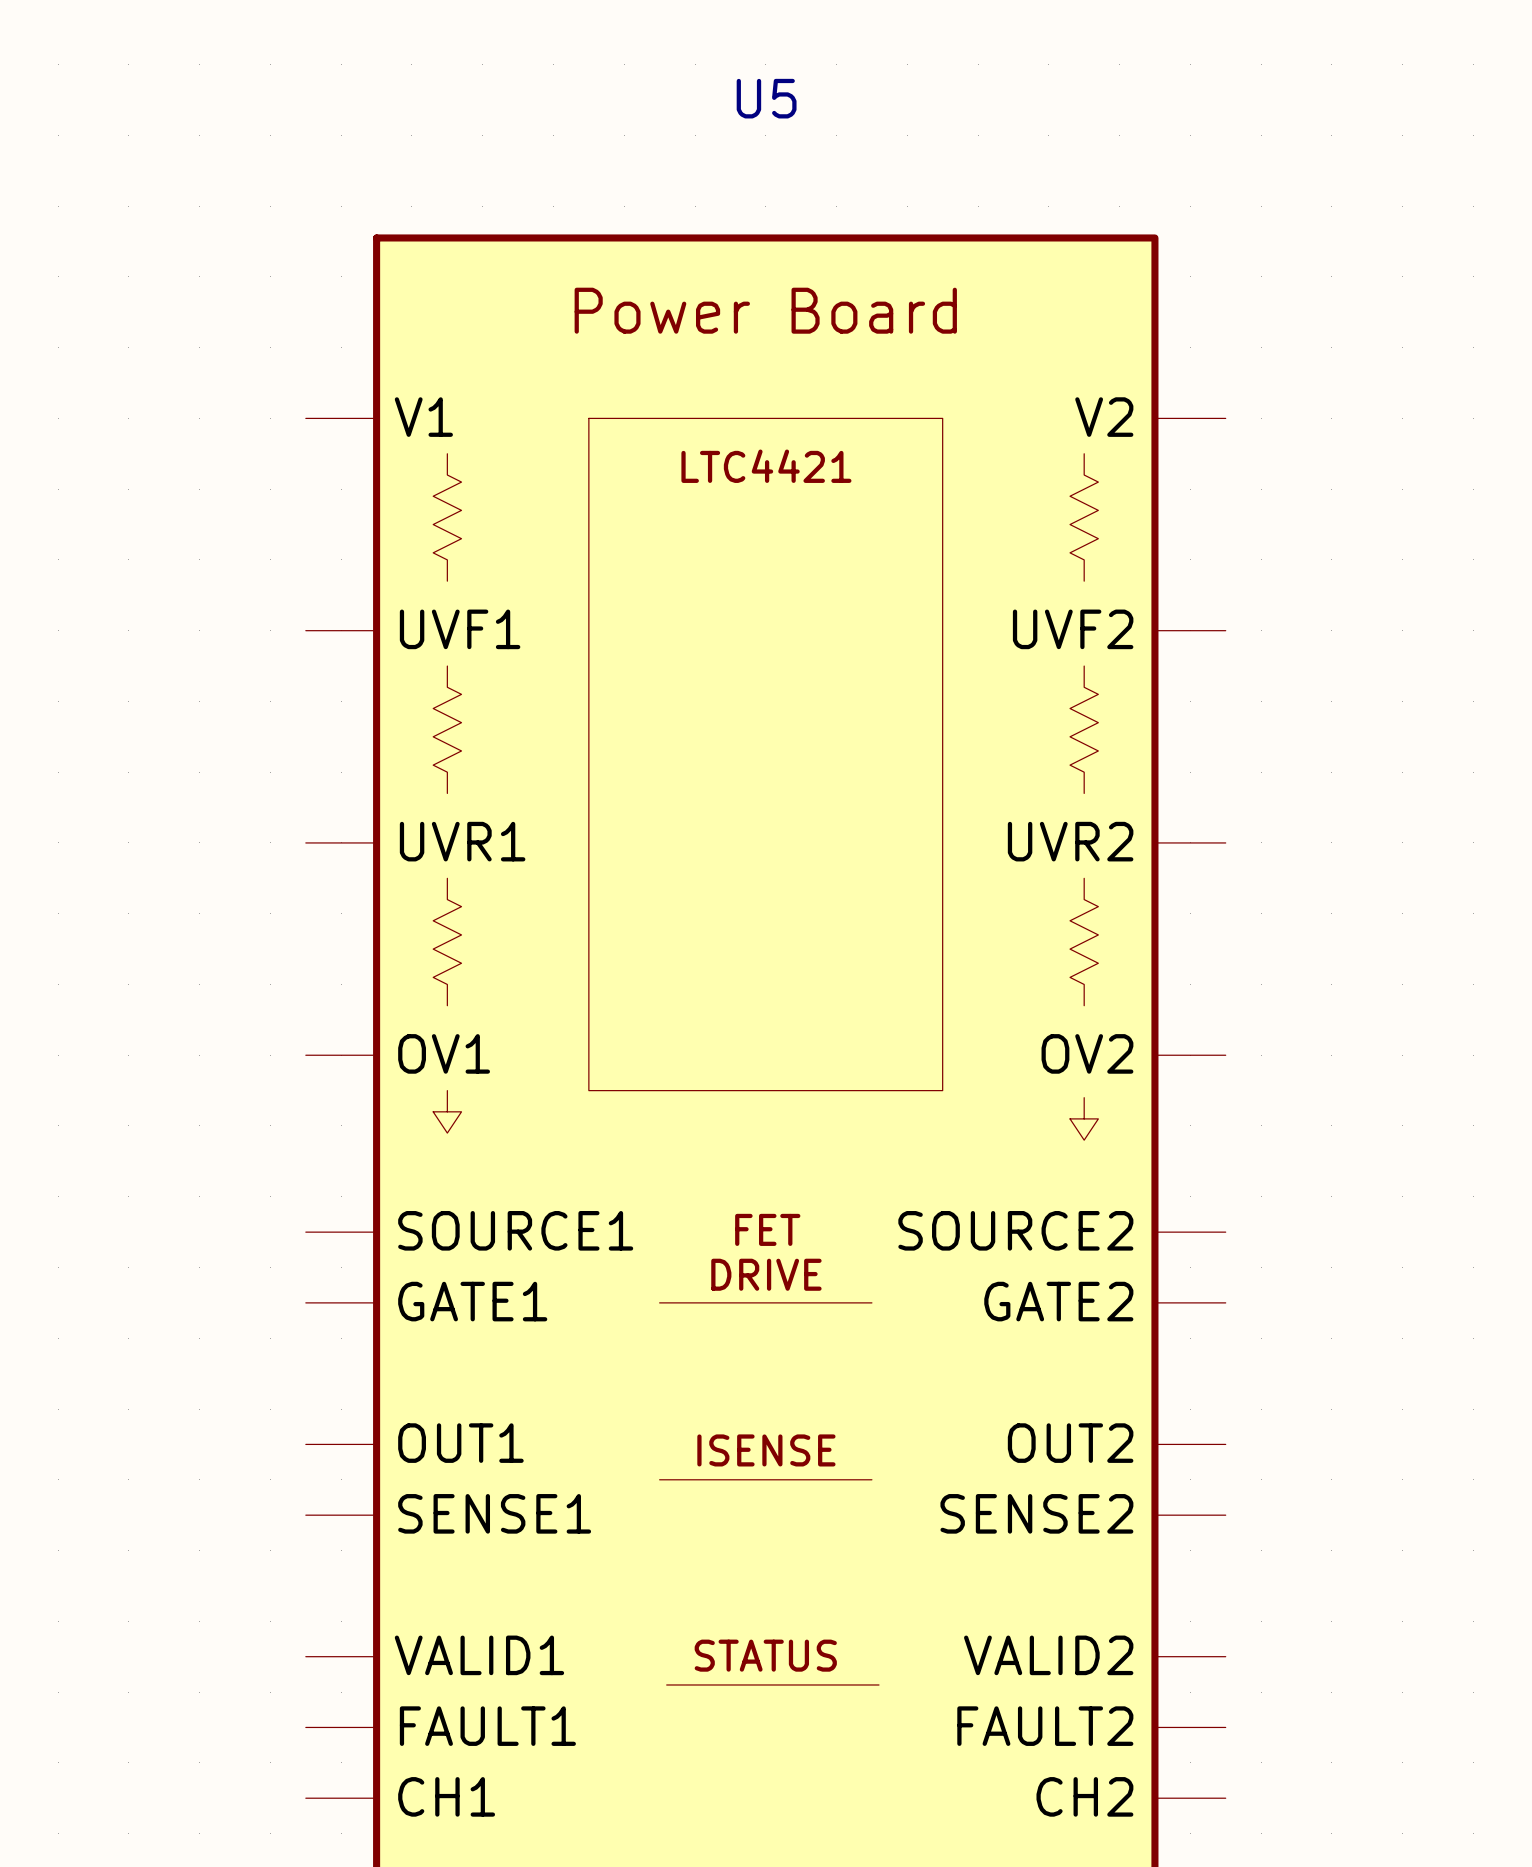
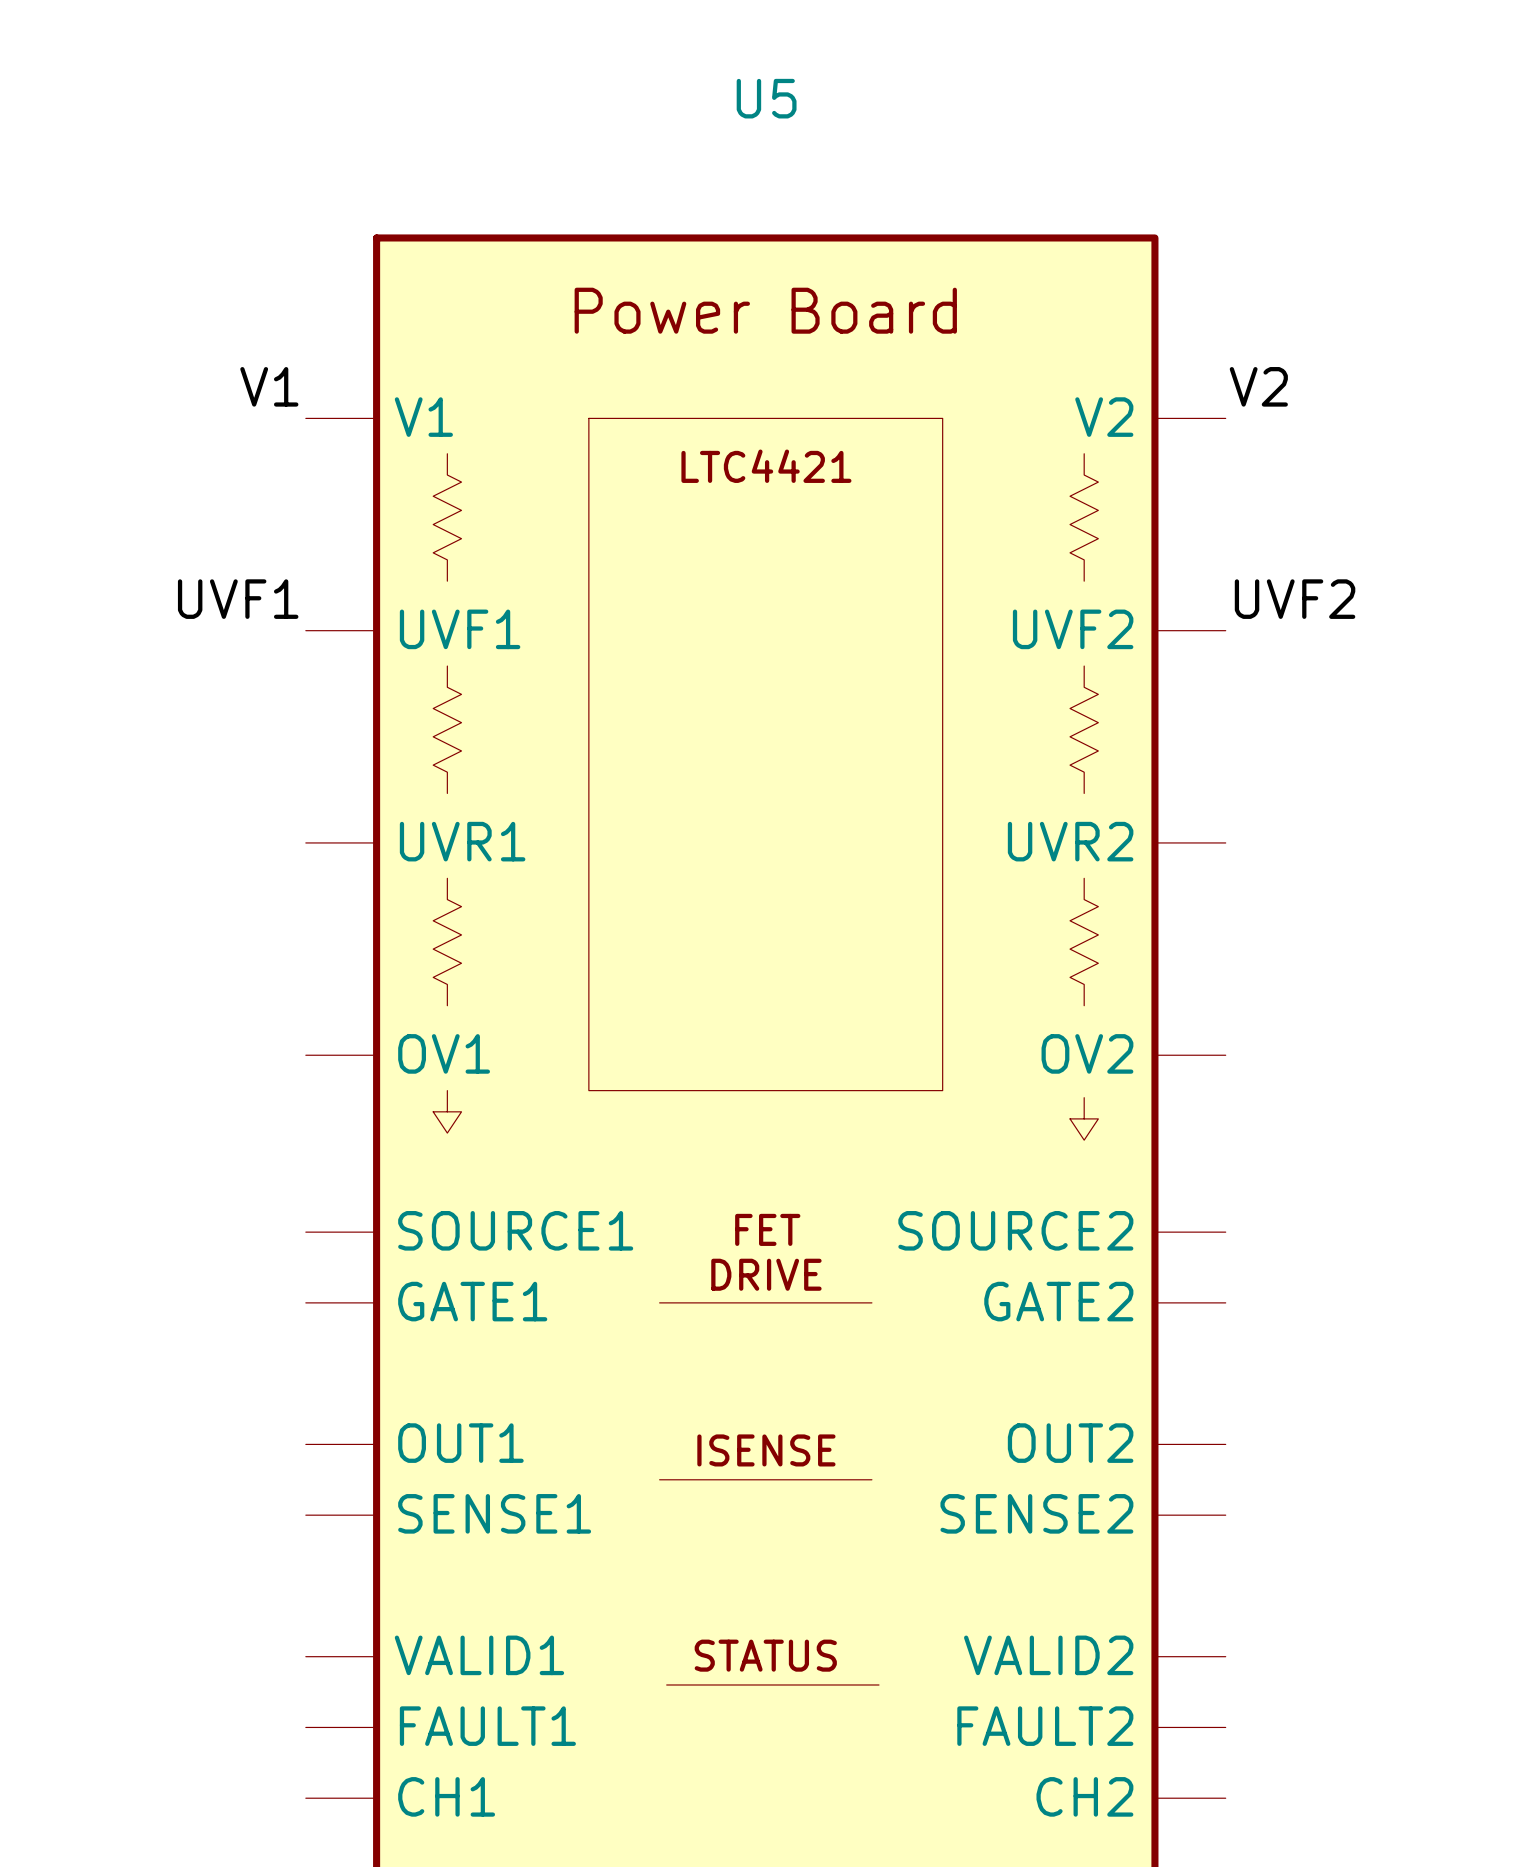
label: none -> V1 (269, 386)
label: none -> V2 (1258, 386)
label: none -> UVF1 (238, 599)
label: none -> UVF2 (1295, 599)

